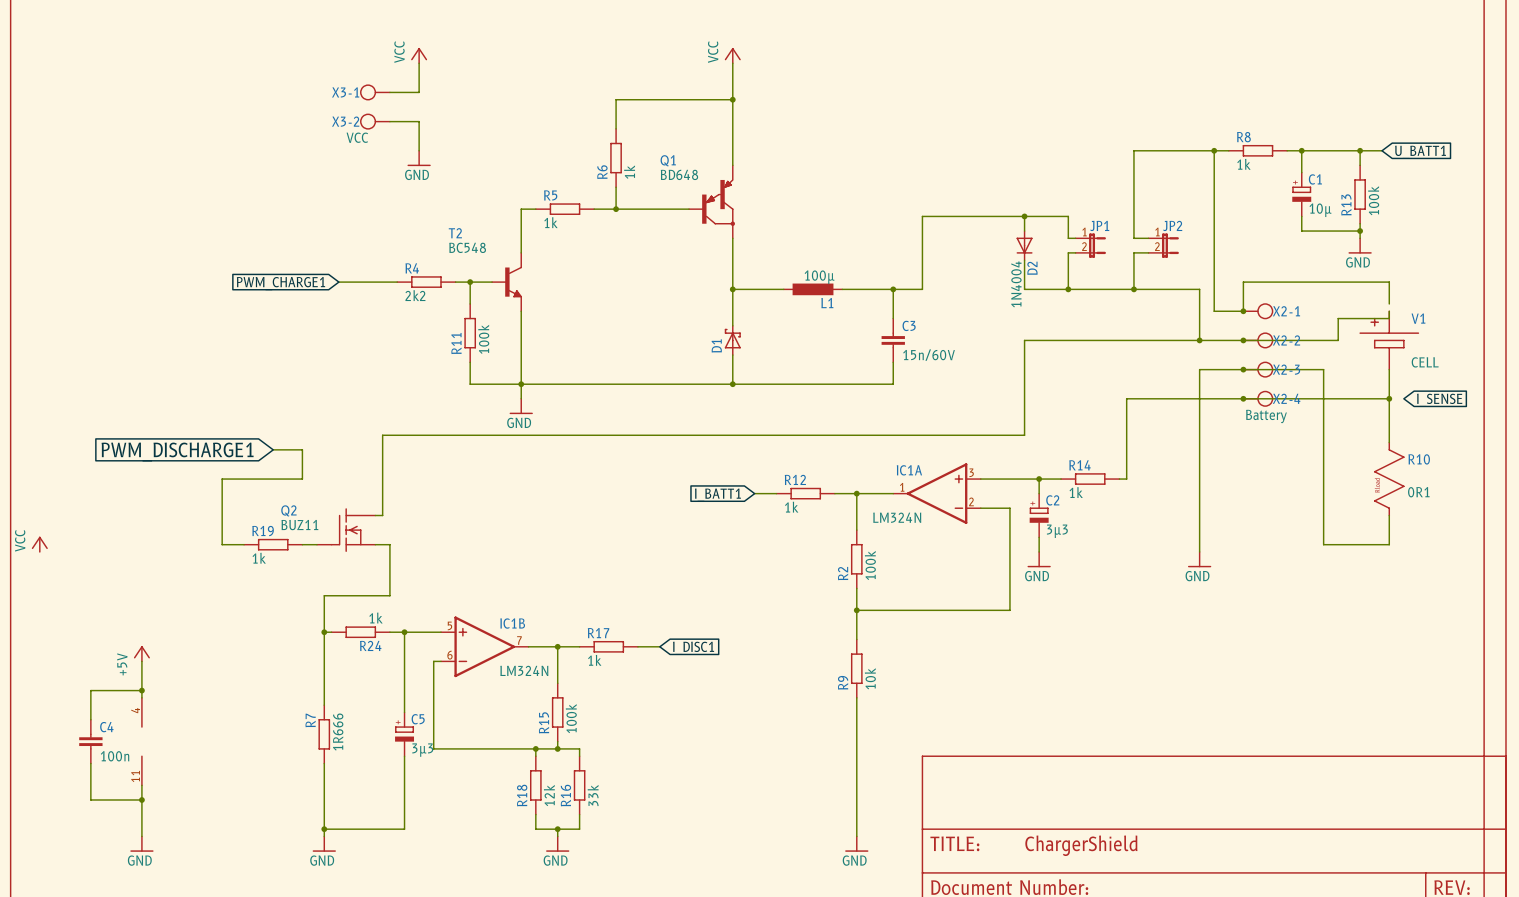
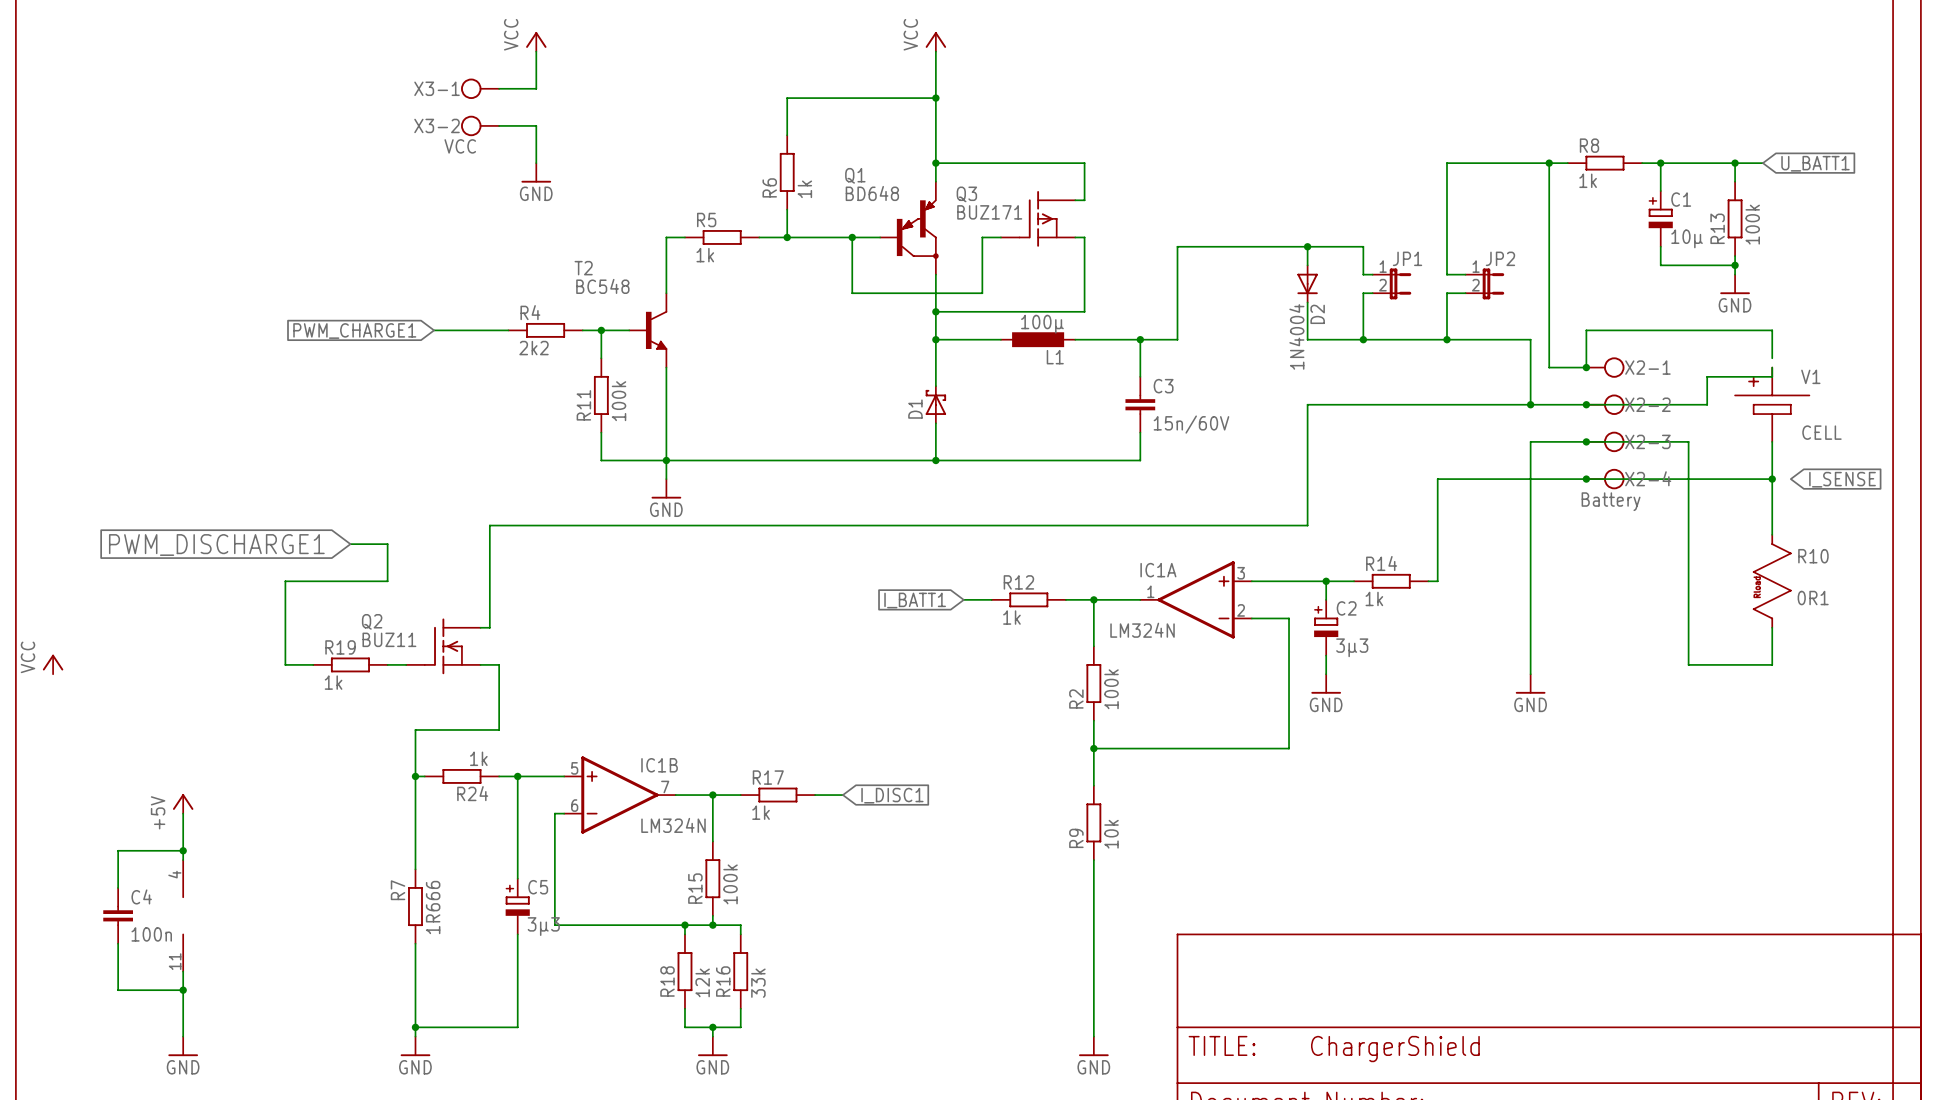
wire: none -> (935, 163) (1084, 163) (1084, 200) (1075, 200)
junction: none -> (935, 163)
Q3: none -> BUZ171 (1038, 218)
wire: none -> (852, 237) (852, 293) (982, 293) (982, 237) (1000, 237)
junction: none -> (852, 237)
wire: none -> (1075, 237) (1084, 237) (1084, 311) (935, 311)
junction: none -> (935, 311)

